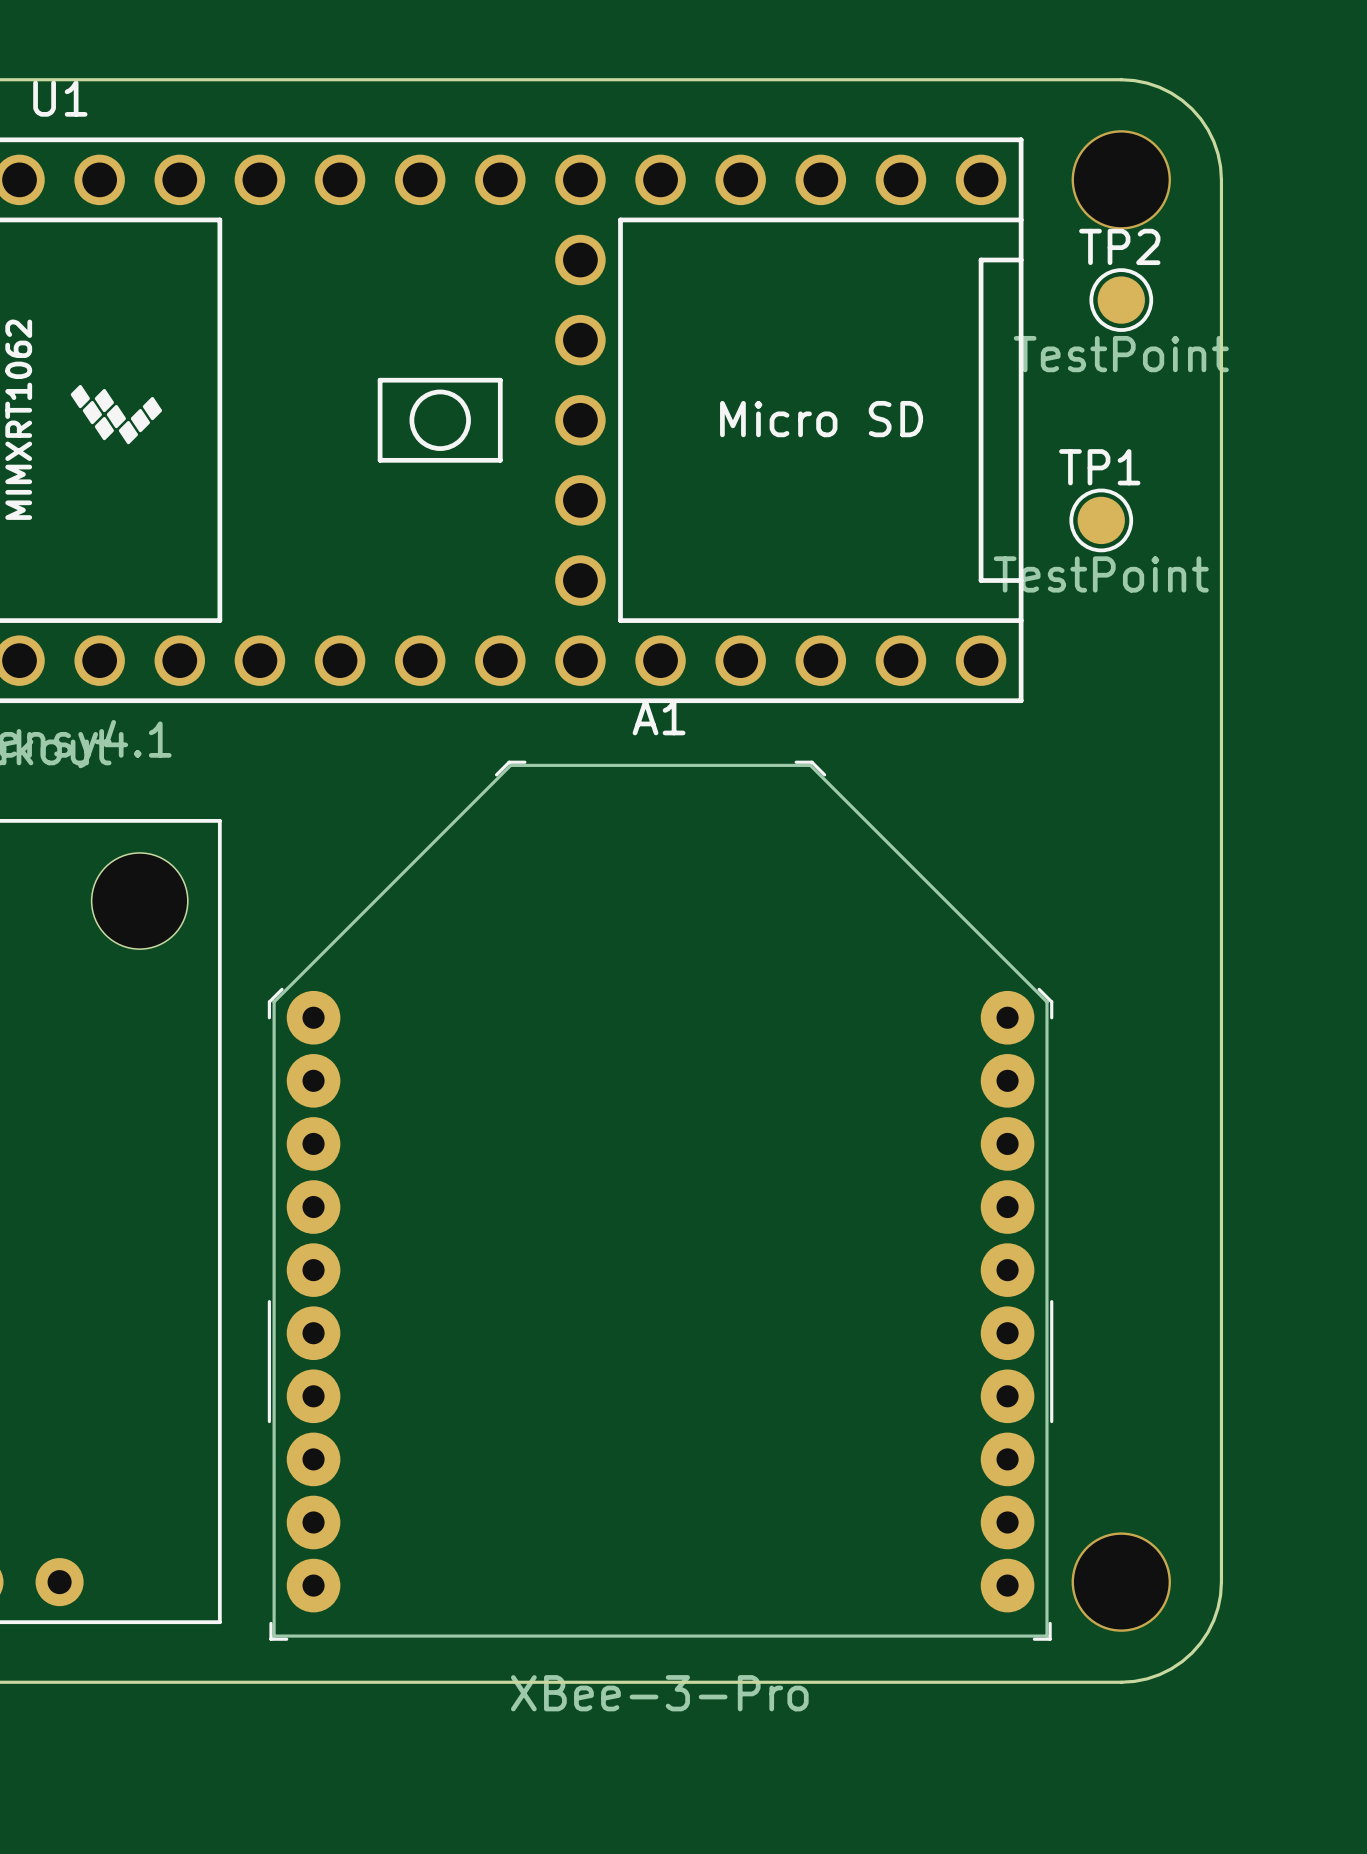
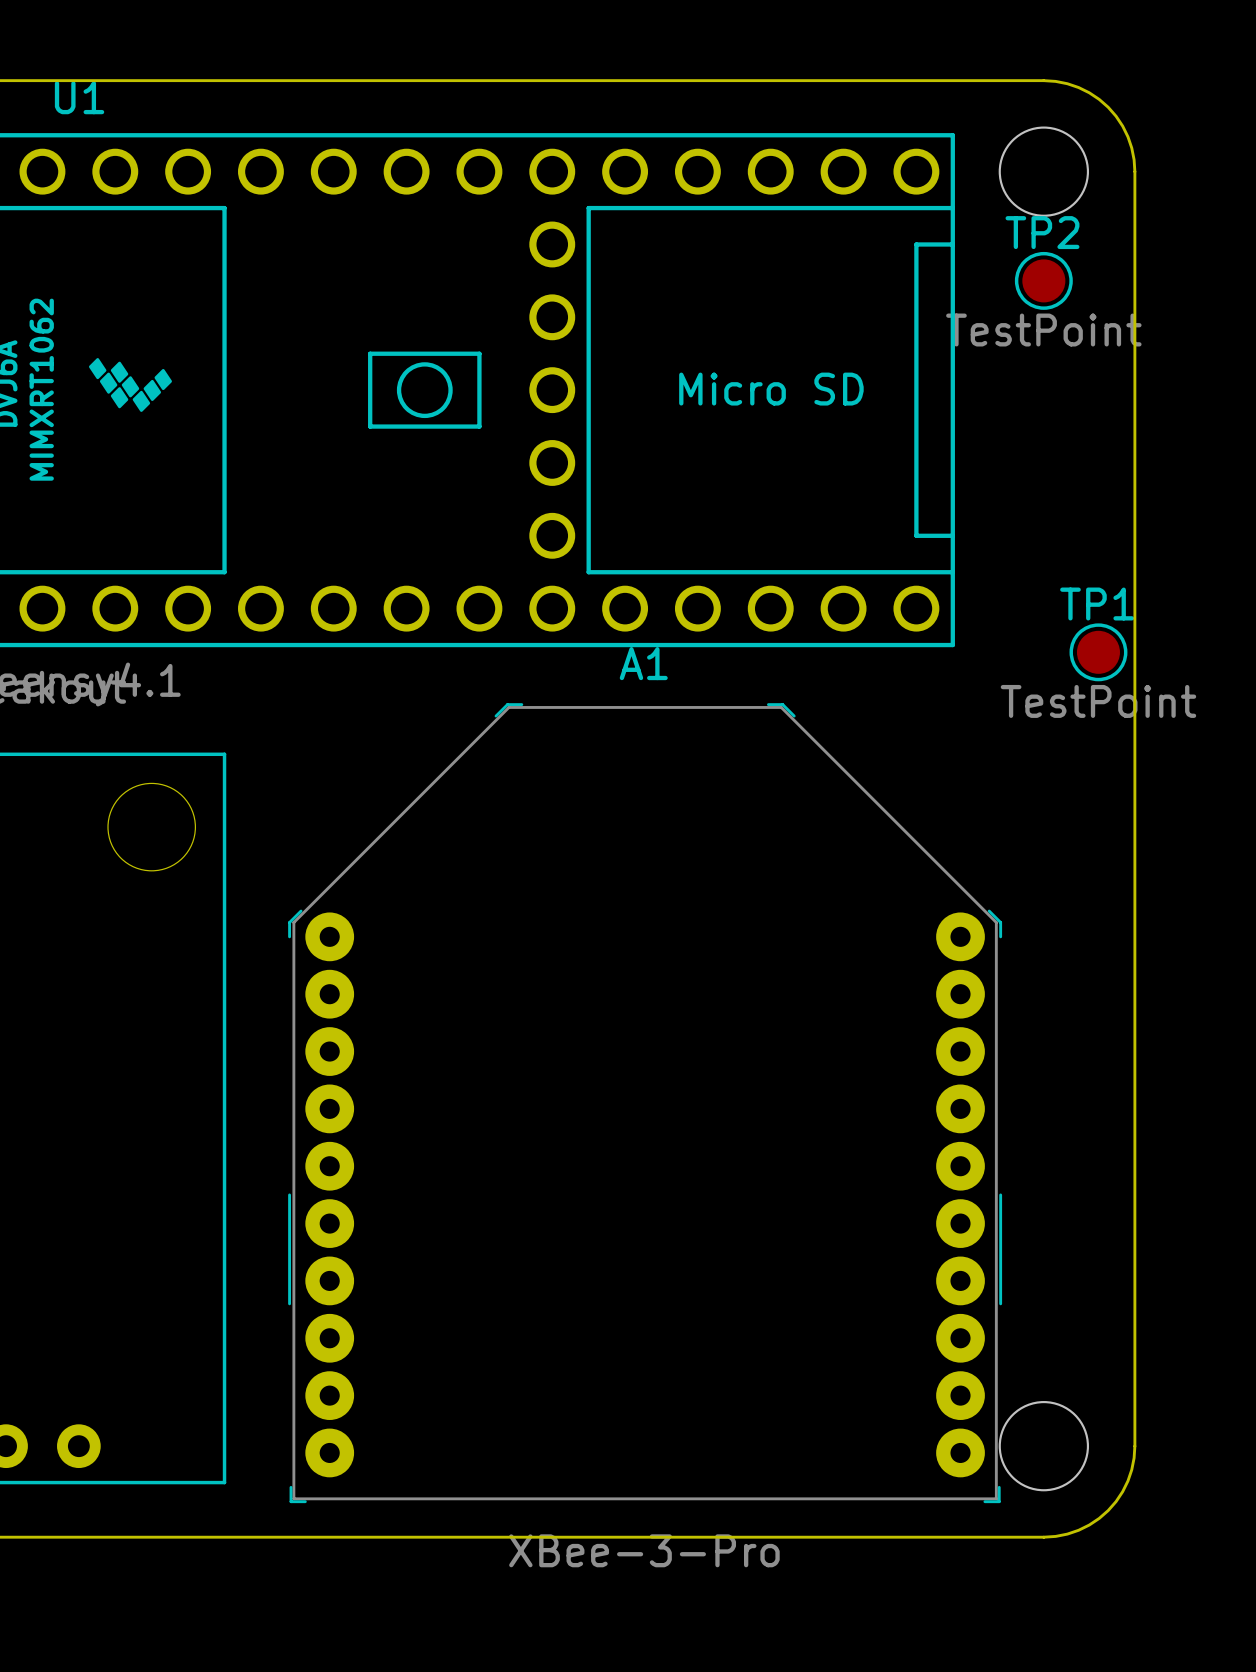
TP1 position: (1101, 520) -> (1098, 652)
A1 position: (660, 1200) -> (645, 1103)

